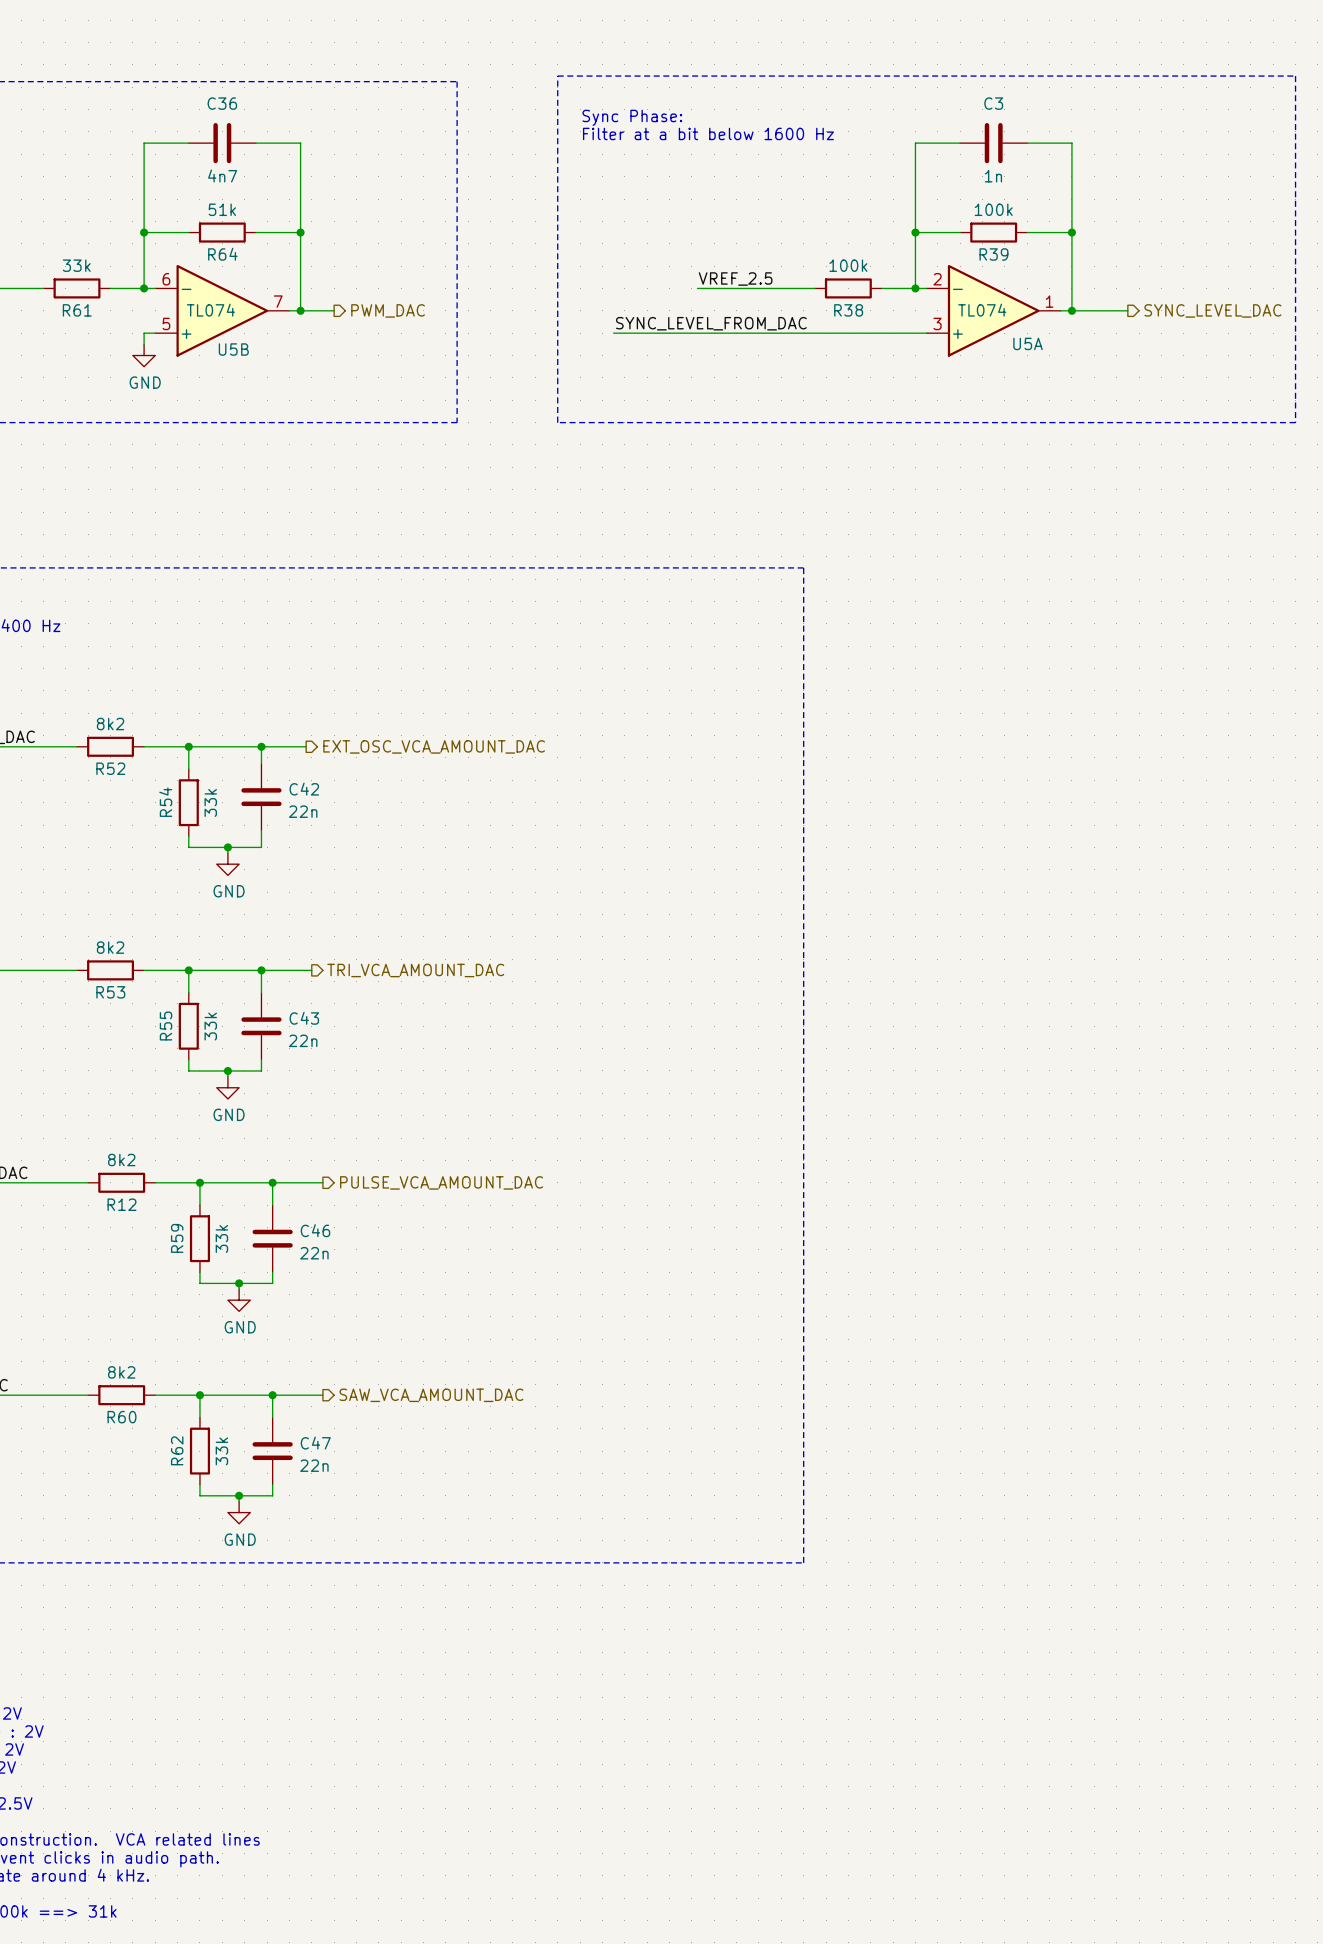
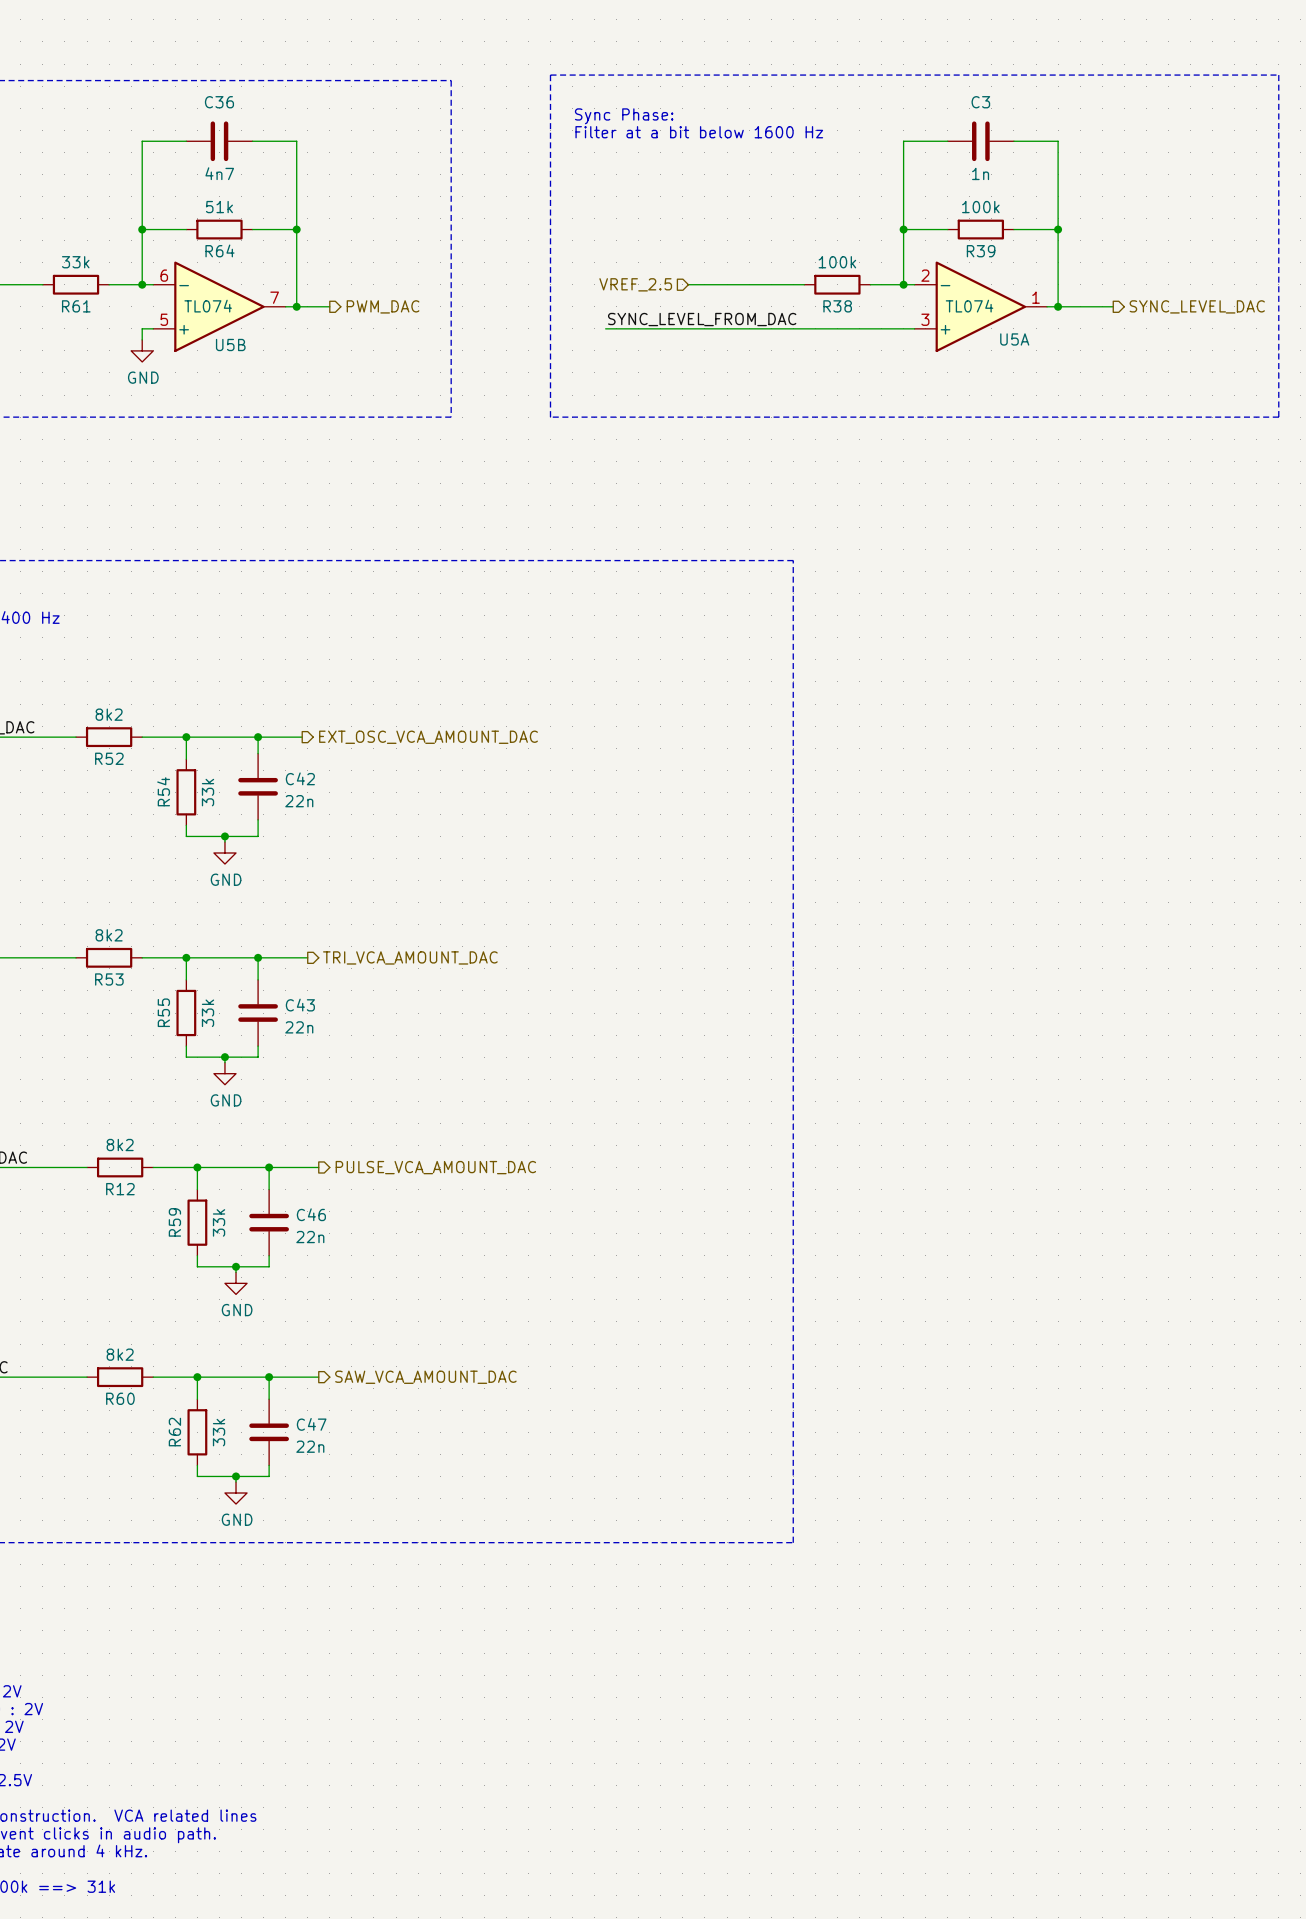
label: VREF_2.5 (735, 279) -> none
hierarchical label: none -> VREF_2.5 (635, 284)

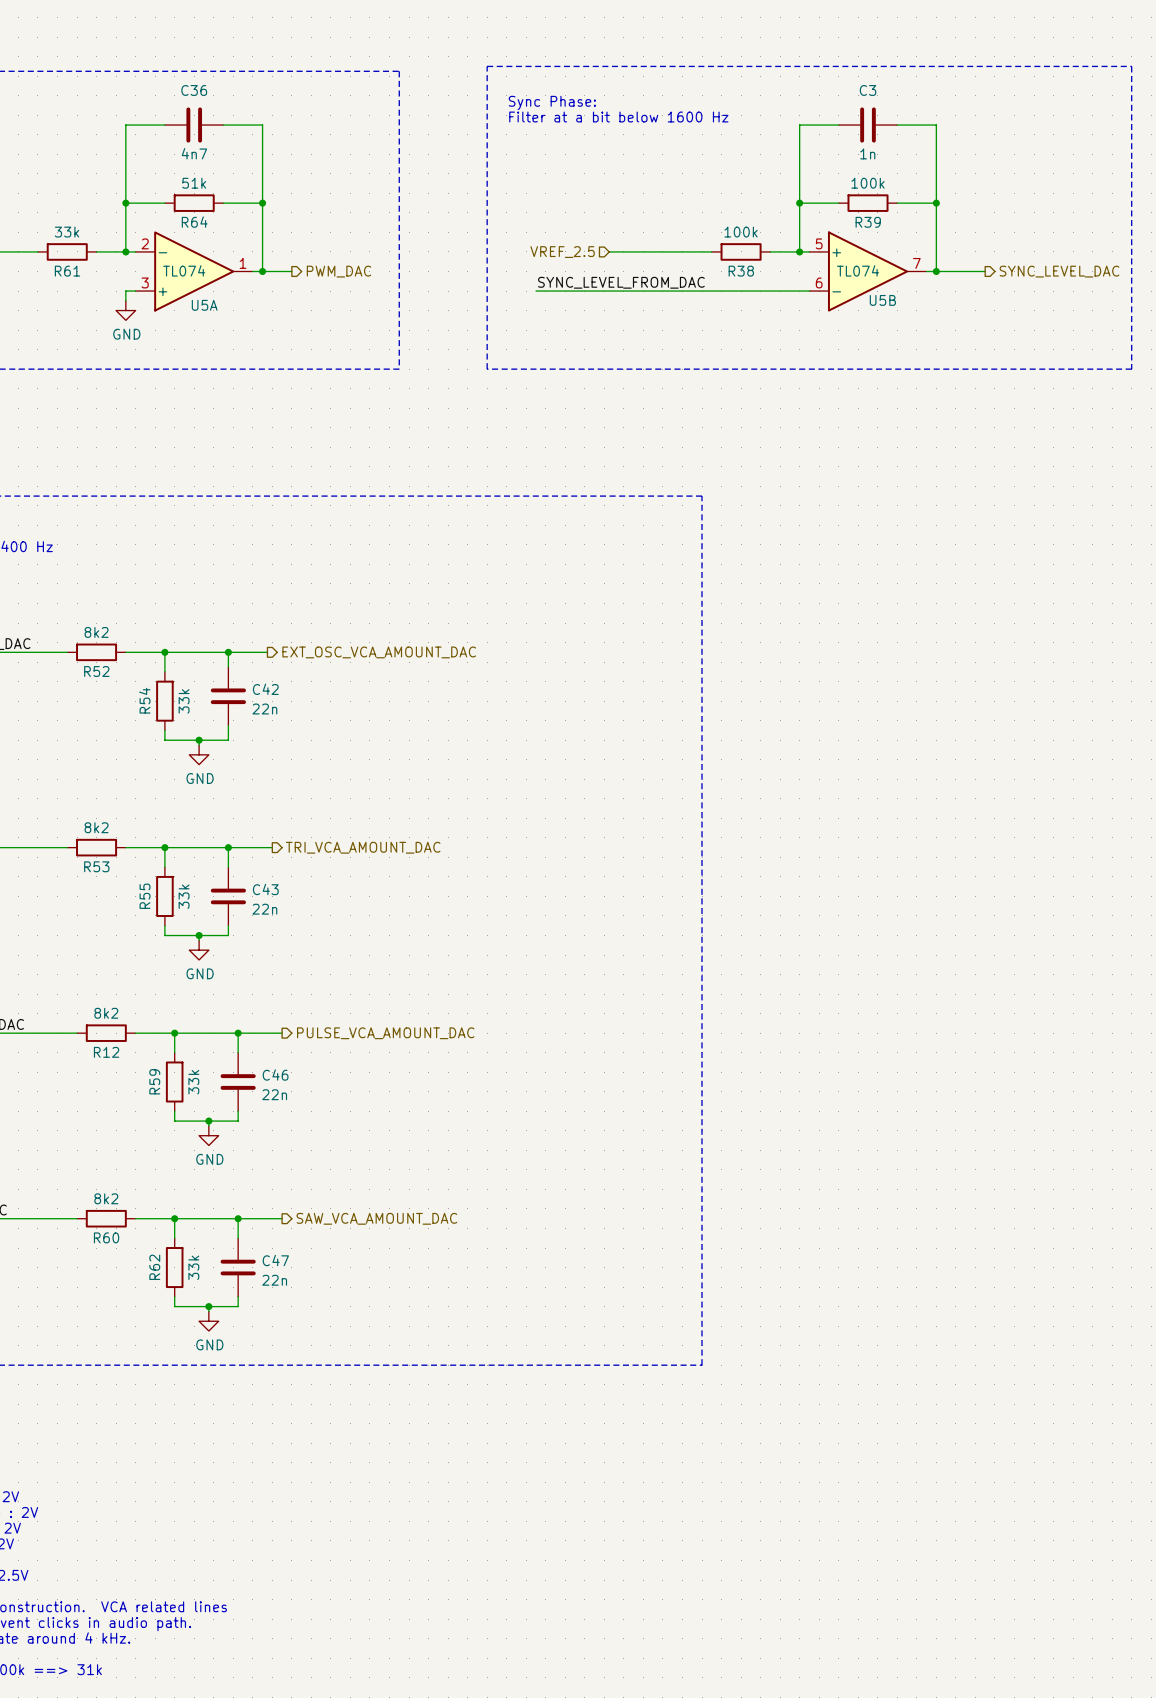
U5B flip: as is (219, 306) -> up-down (868, 271)
U5B position: (219, 306) -> (868, 271)
U5A position: (980, 306) -> (194, 271)
U5A name position: U5A (1014, 339) -> U5A (204, 305)

